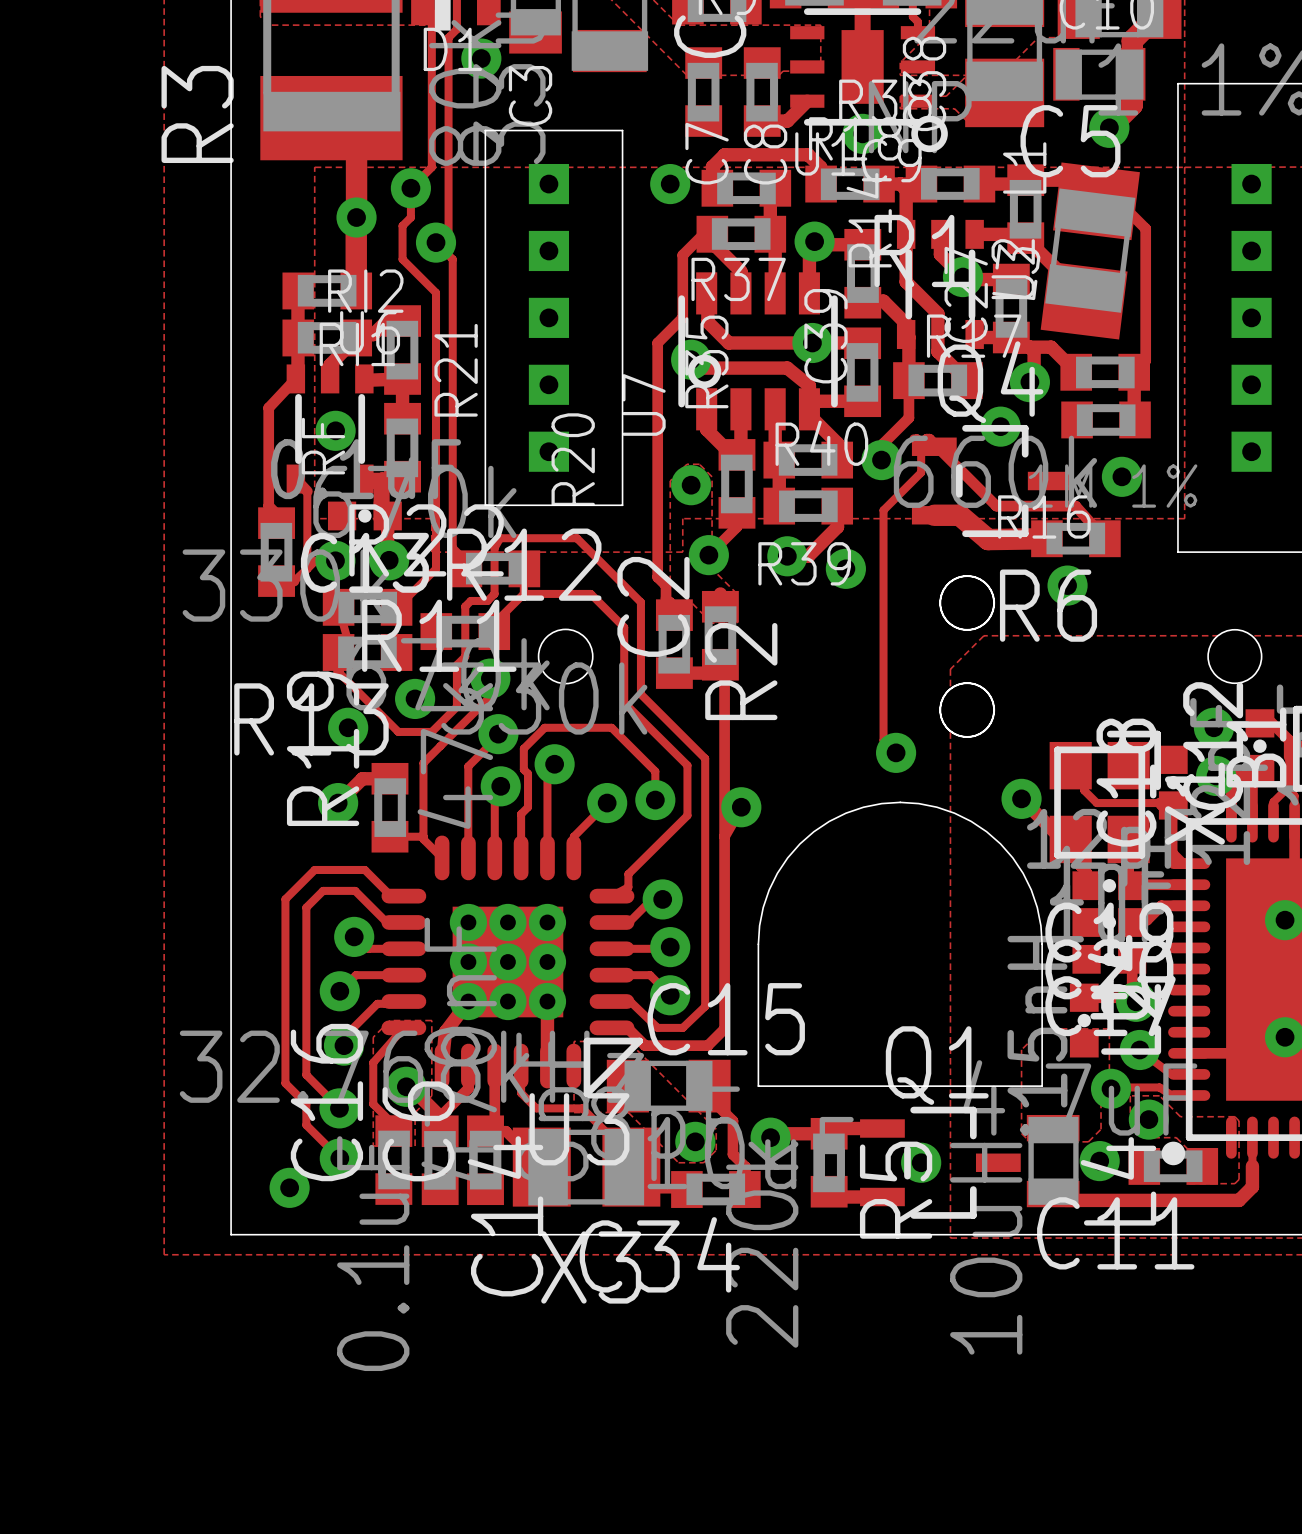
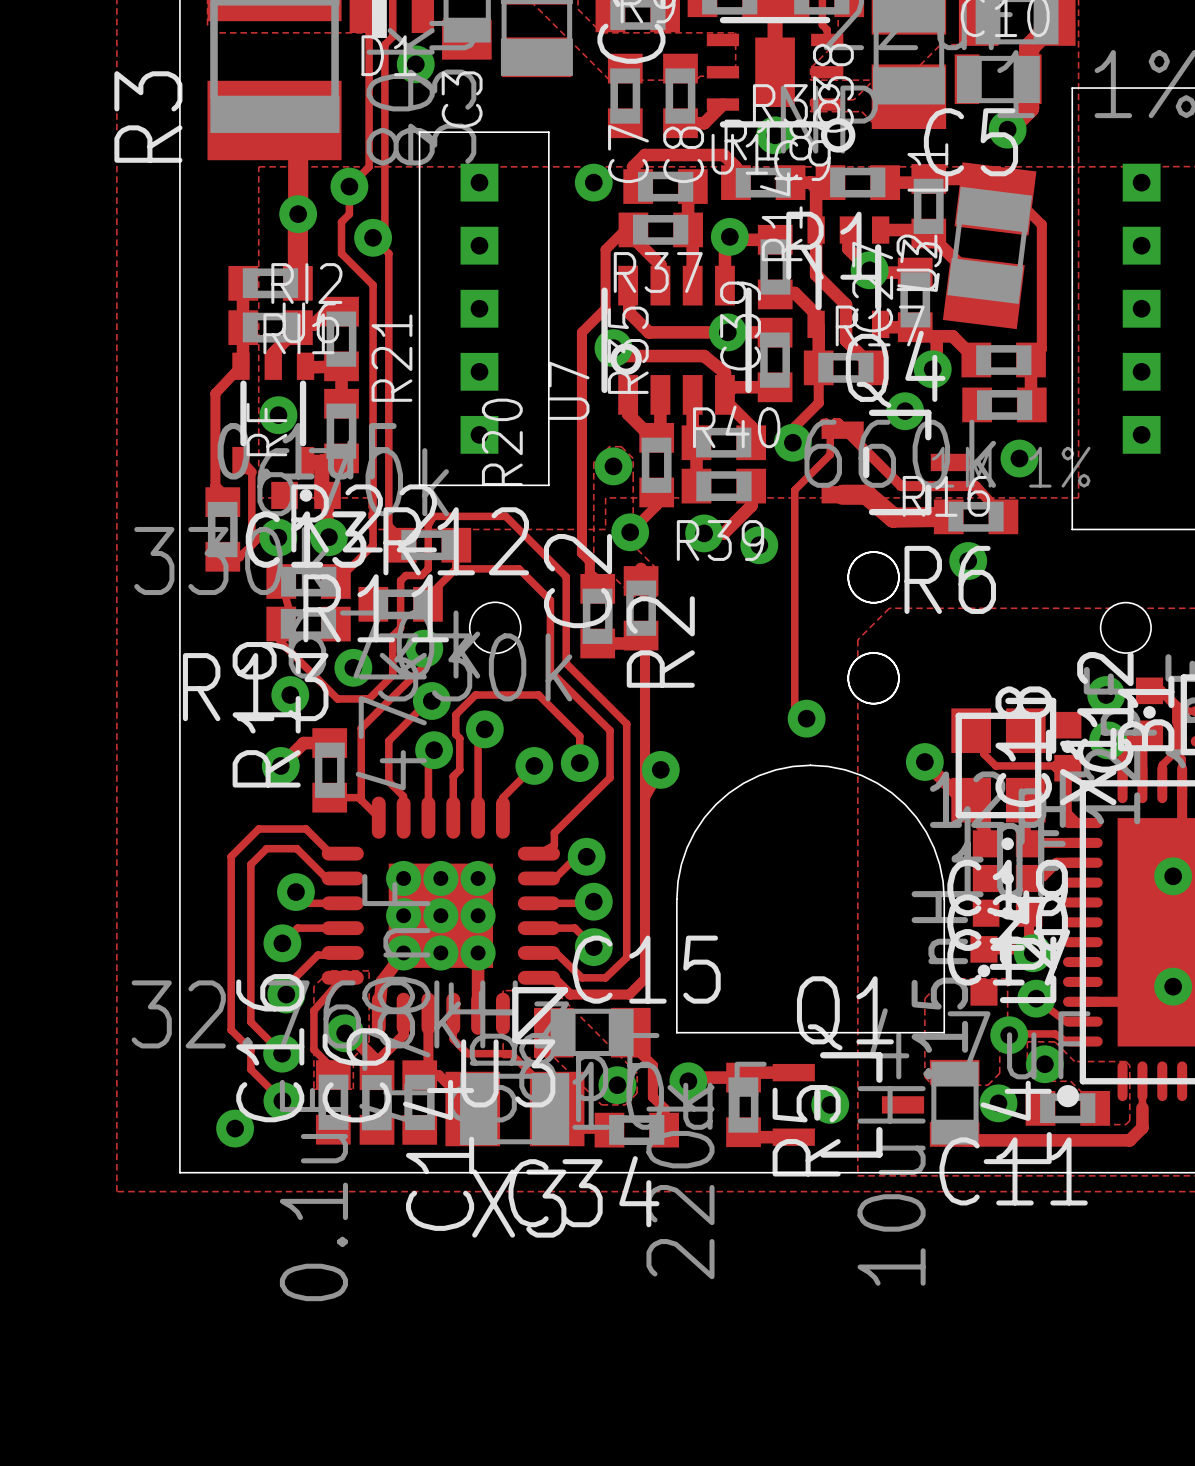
track: (498, 734) (497, 737) (468, 766) (468, 835) -> (424, 704) (388, 740) (388, 781) (403, 796)

